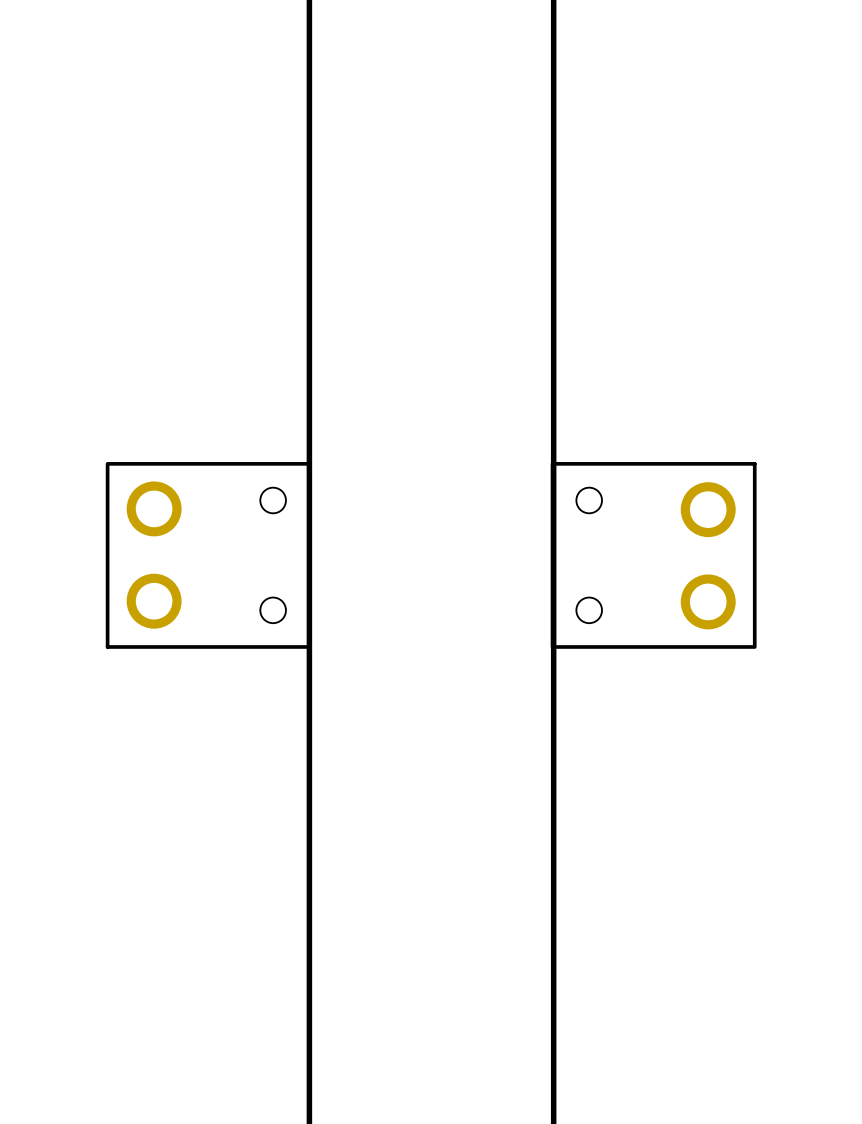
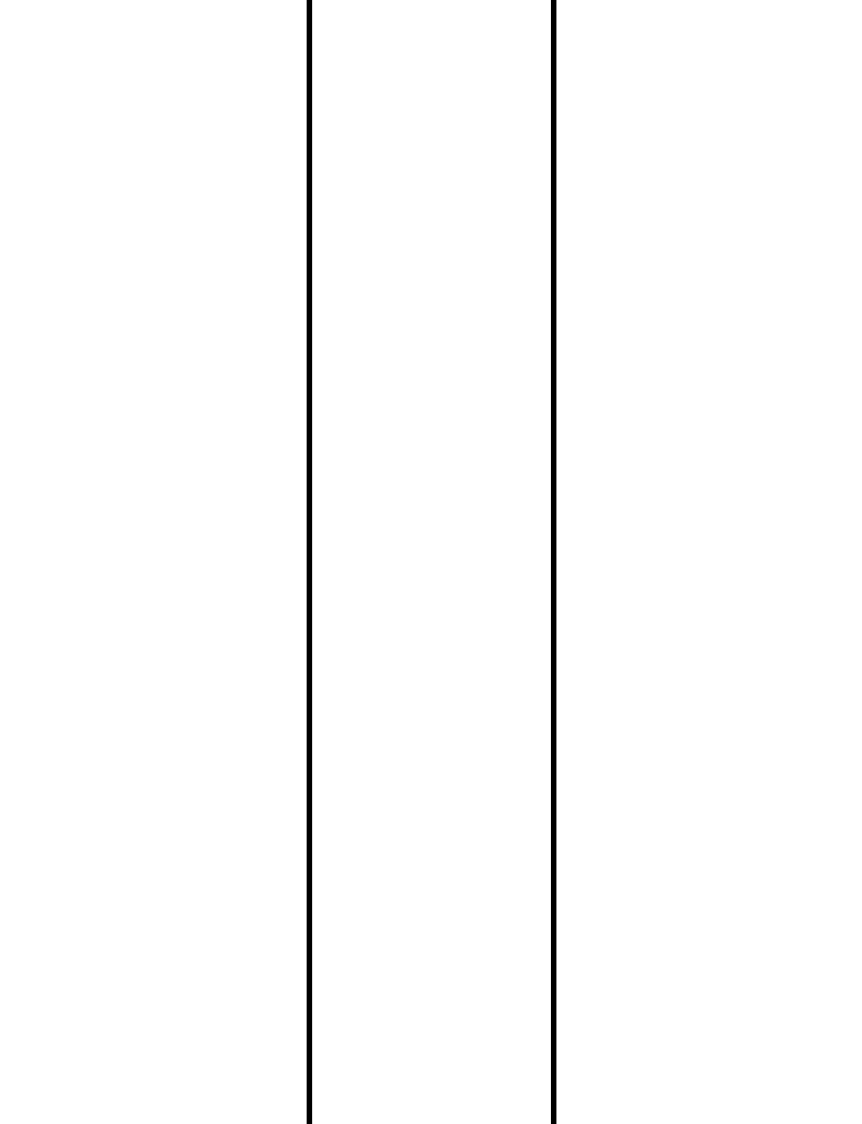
part: (208, 555) -> none
part: (653, 555) -> none

